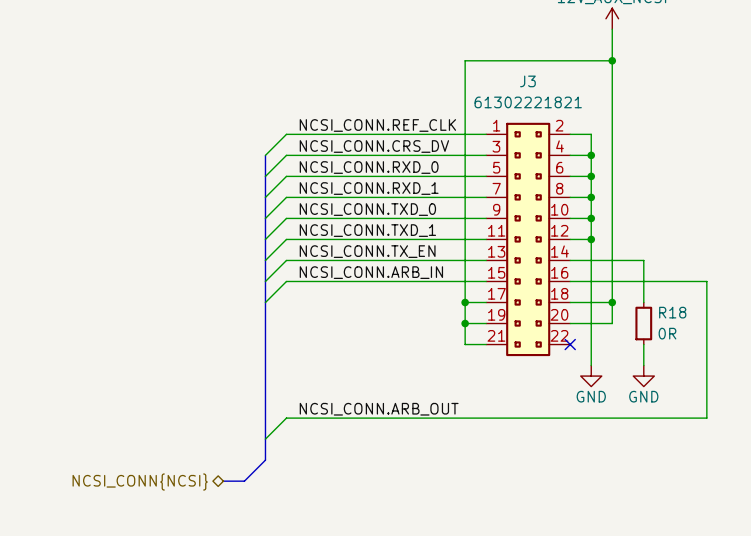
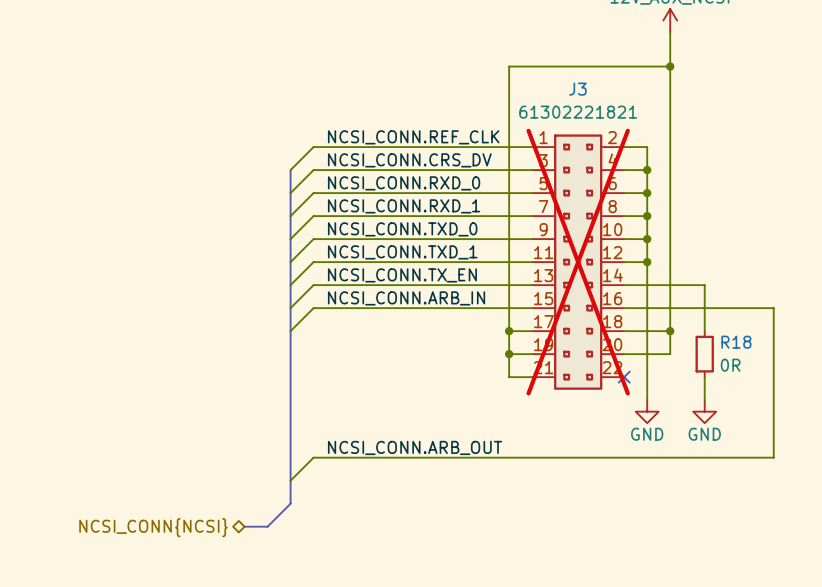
J3 do-not-place cross: none -> (578, 262)

